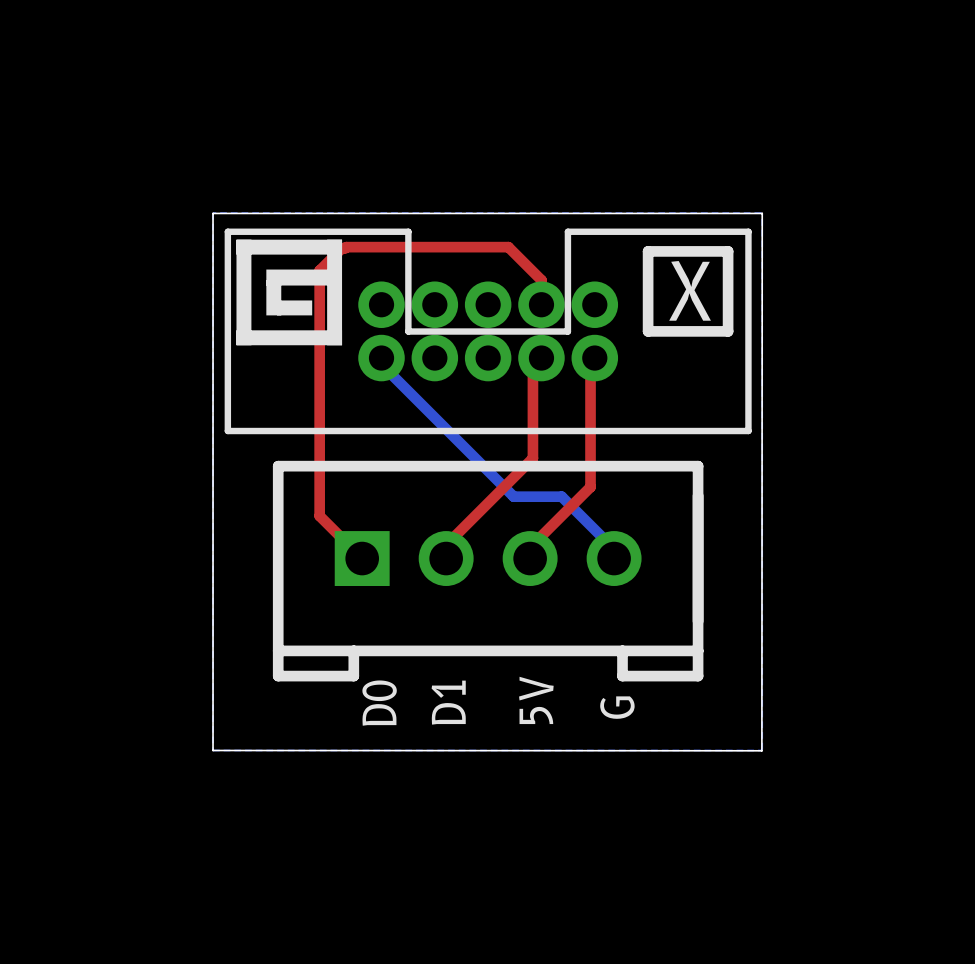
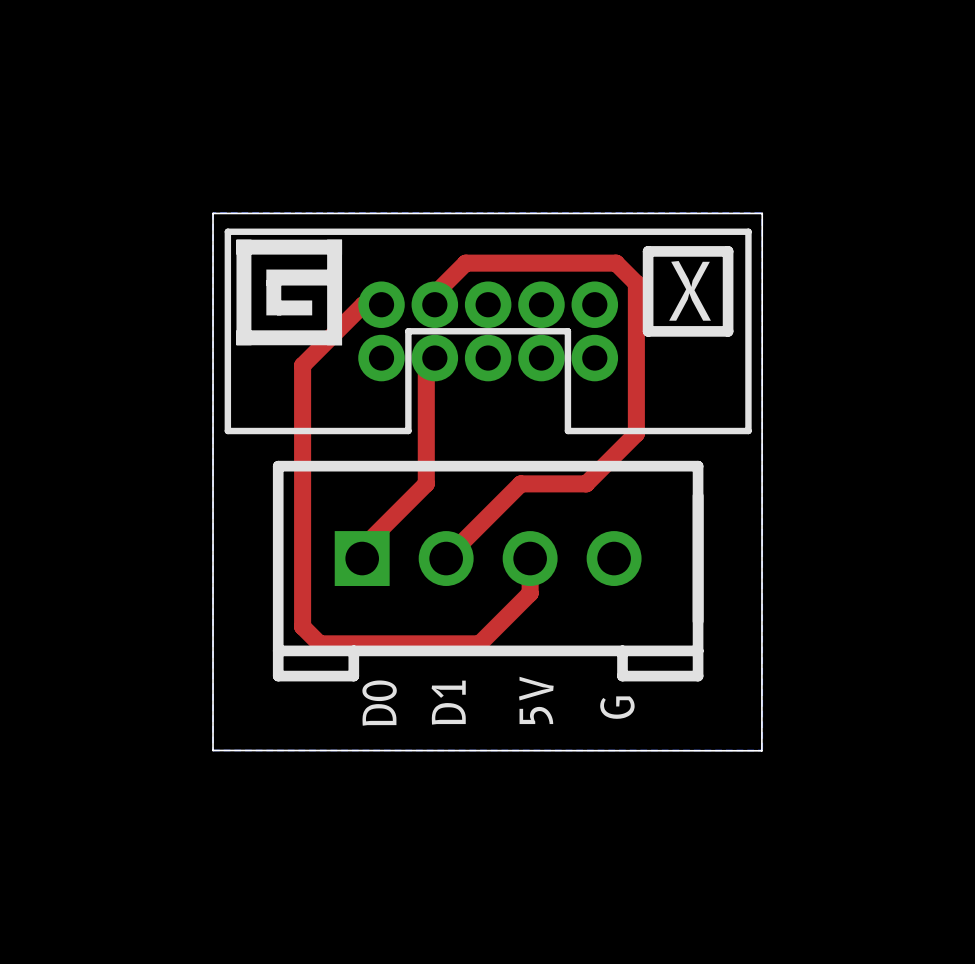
top track: (541, 304) (541, 280) (508, 247) (346, 247) (342, 248) (319, 270) (319, 515) (362, 558) -> (434, 358) (426, 366) (426, 483) (362, 547) (362, 558)
part rotation: 0° (488, 331) -> 180° (488, 331)
bottom track: (381, 358) (388, 362) (388, 371) (513, 496) (561, 496) (609, 544) (614, 558) -> none
top track: (541, 358) (532, 362) (532, 458) (446, 544) (443, 548) (443, 558) (446, 558) -> (434, 304) (434, 294) (465, 263) (616, 263) (636, 283) (636, 433) (586, 483) (520, 483) (446, 558)
top track: (594, 358) (590, 362) (590, 487) (532, 544) (530, 558) -> (381, 304) (363, 304) (302, 365) (302, 626) (319, 643) (479, 643) (530, 593) (530, 558)

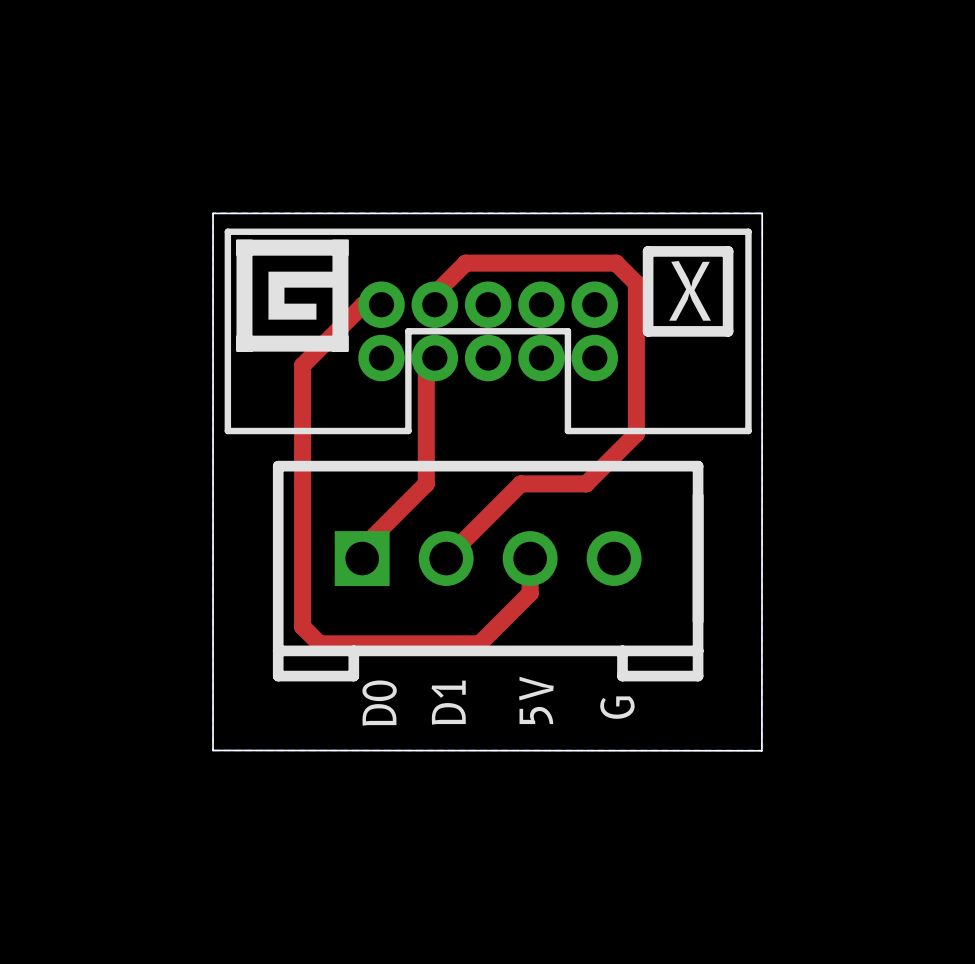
drawing: [236, 239, 343, 346] -> none
drawing: none -> [236, 239, 349, 352]

